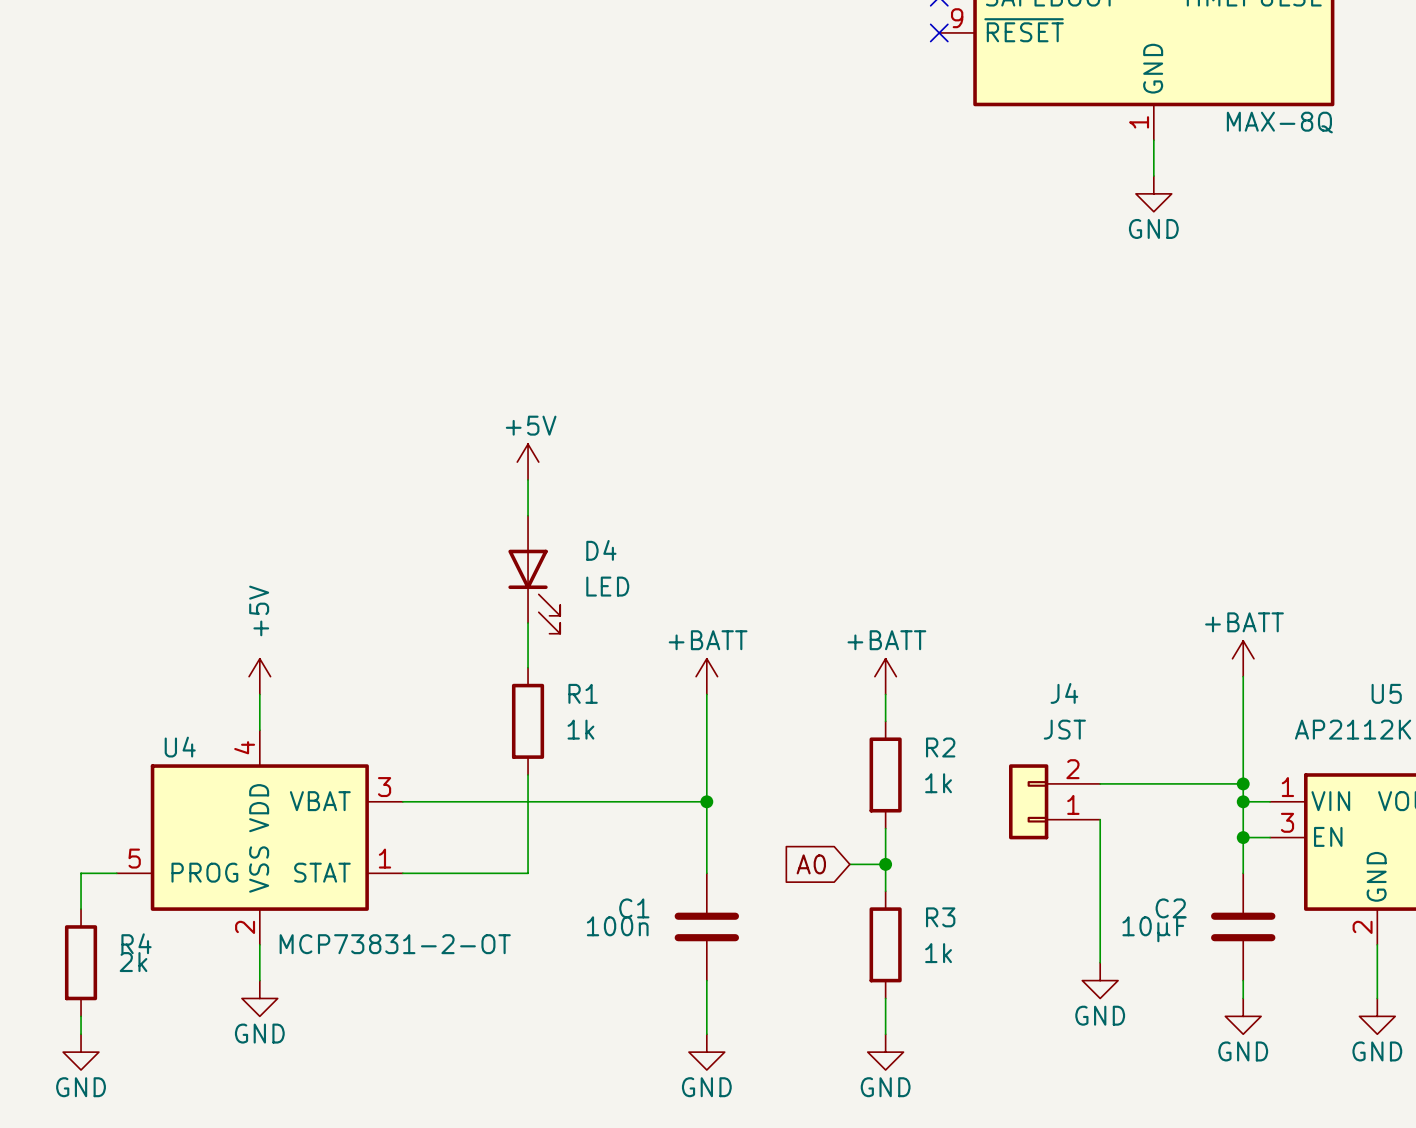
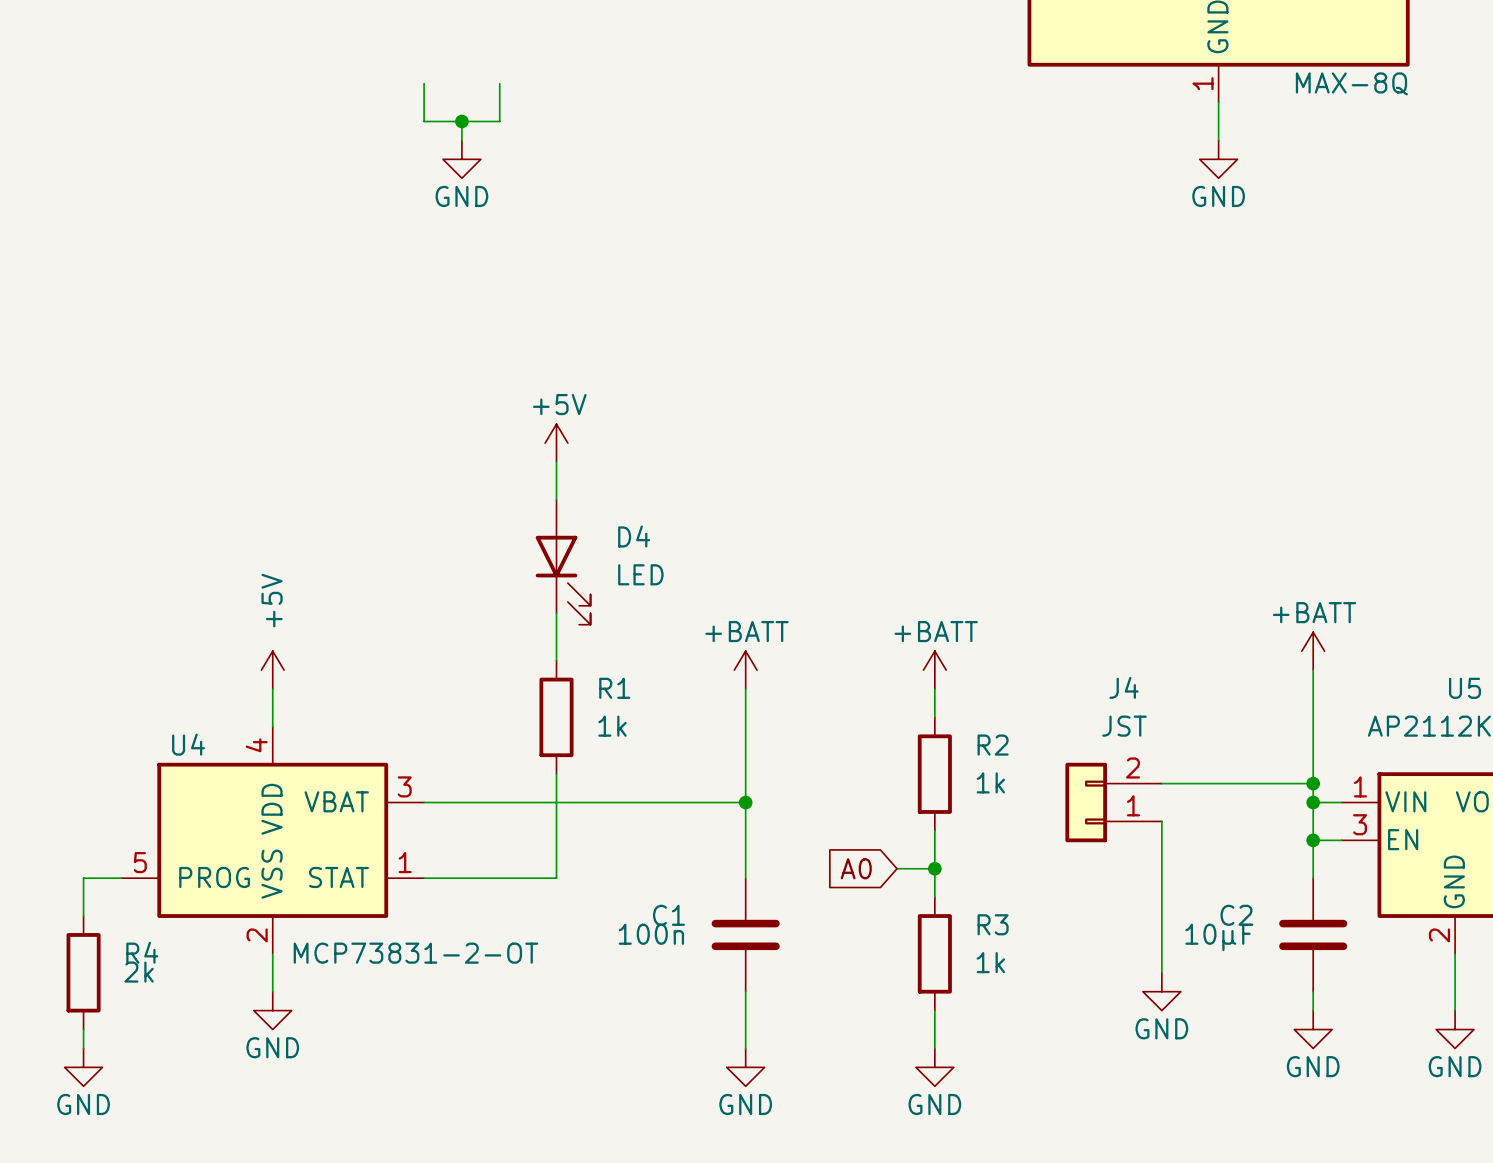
wire: none -> (424, 83) (424, 121) (499, 121) (499, 83)
wire: none -> (461, 121) (461, 140)
junction: none -> (461, 121)
power symbol: none -> GND (461, 159)

